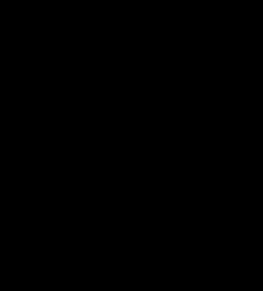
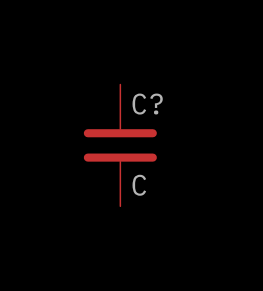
C?: none -> C (120, 145)

